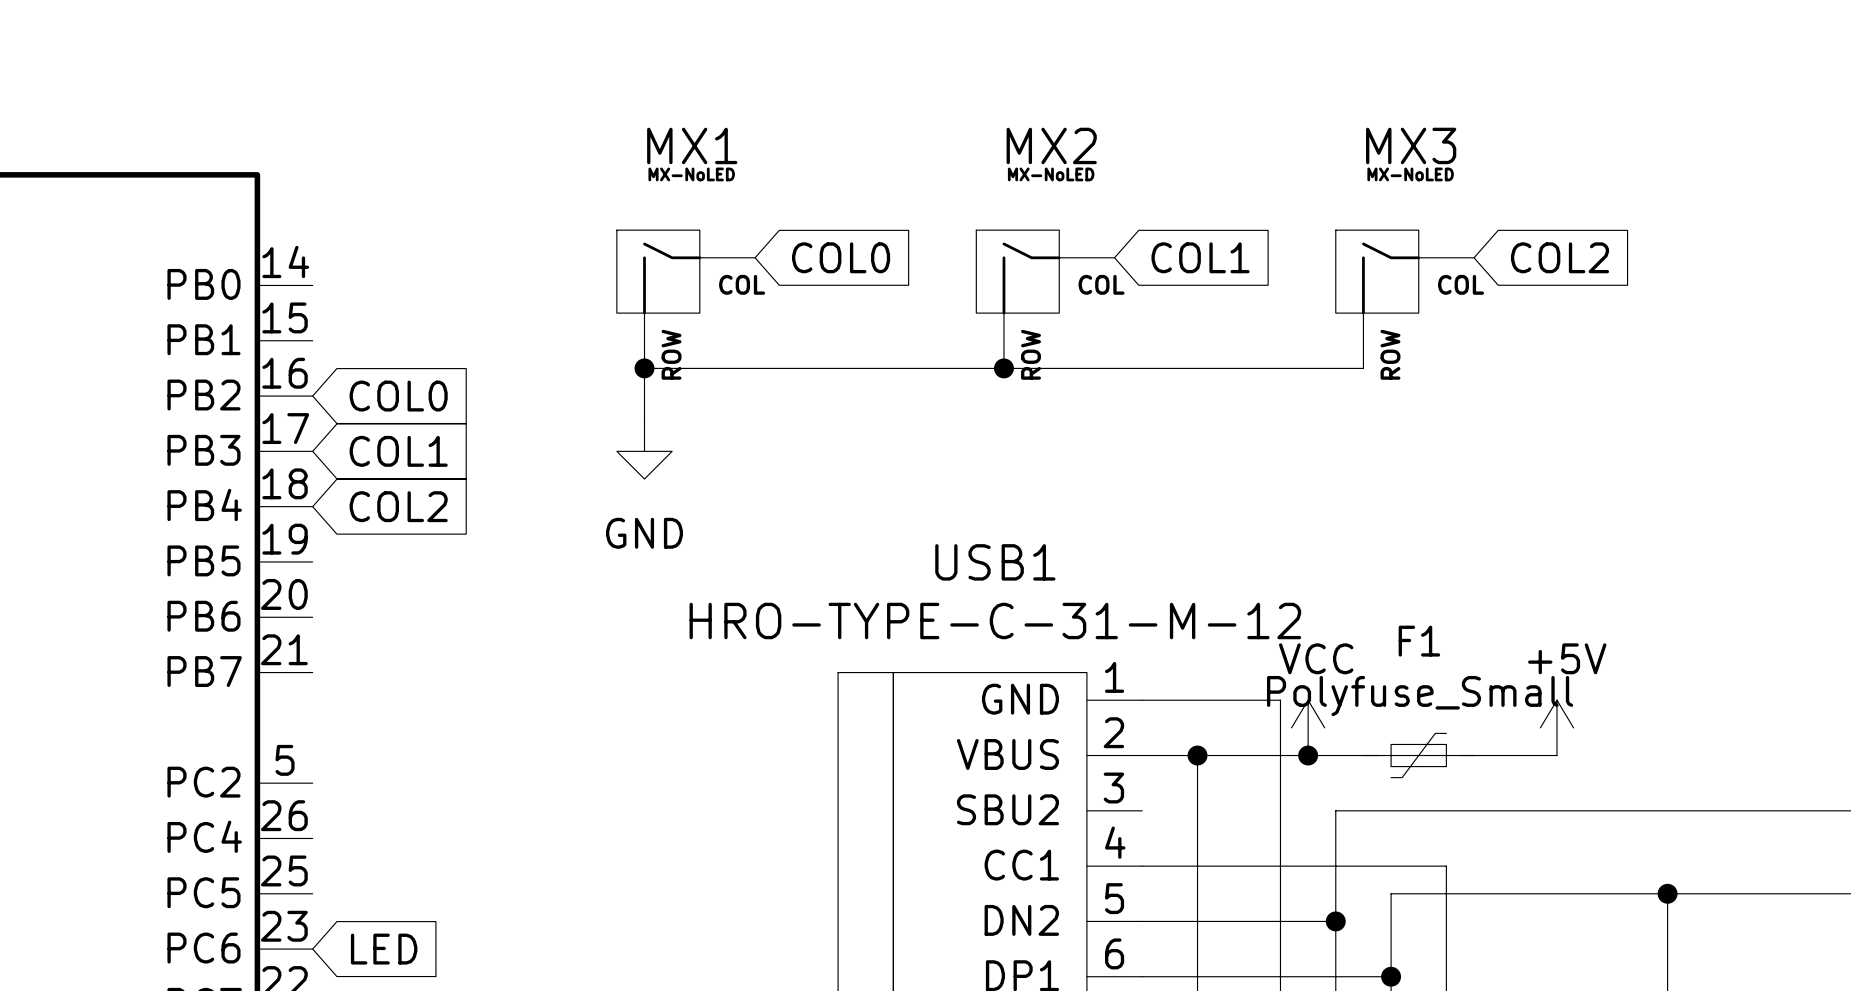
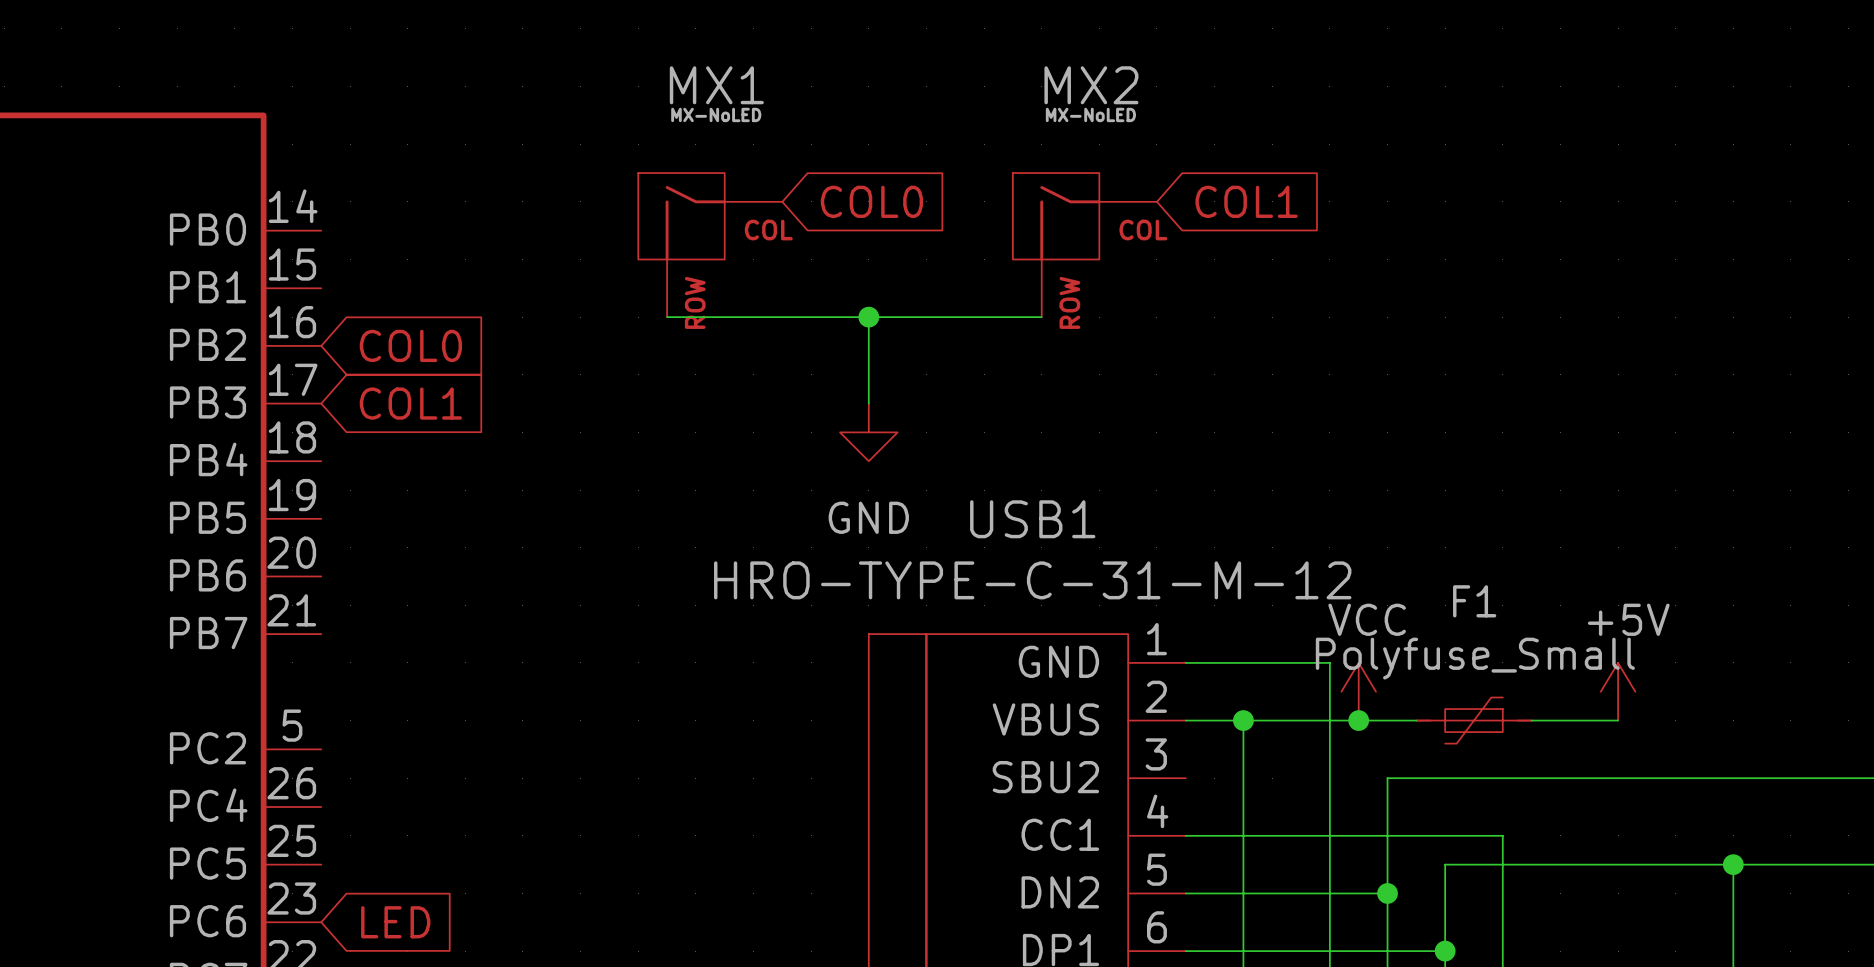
global label: COL2 (1559, 257) -> none
MX3: MX-NoLED (1404, 299) -> none
wire: (644, 368) (644, 423) -> none
junction: (644, 368) -> none
wire: none -> (868, 317) (868, 403)
junction: none -> (868, 317)
wire: (1003, 368) (1363, 368) -> none
junction: (1003, 368) -> none
power symbol position: GND (644, 451) -> GND (868, 432)
global label: COL2 (398, 506) -> none

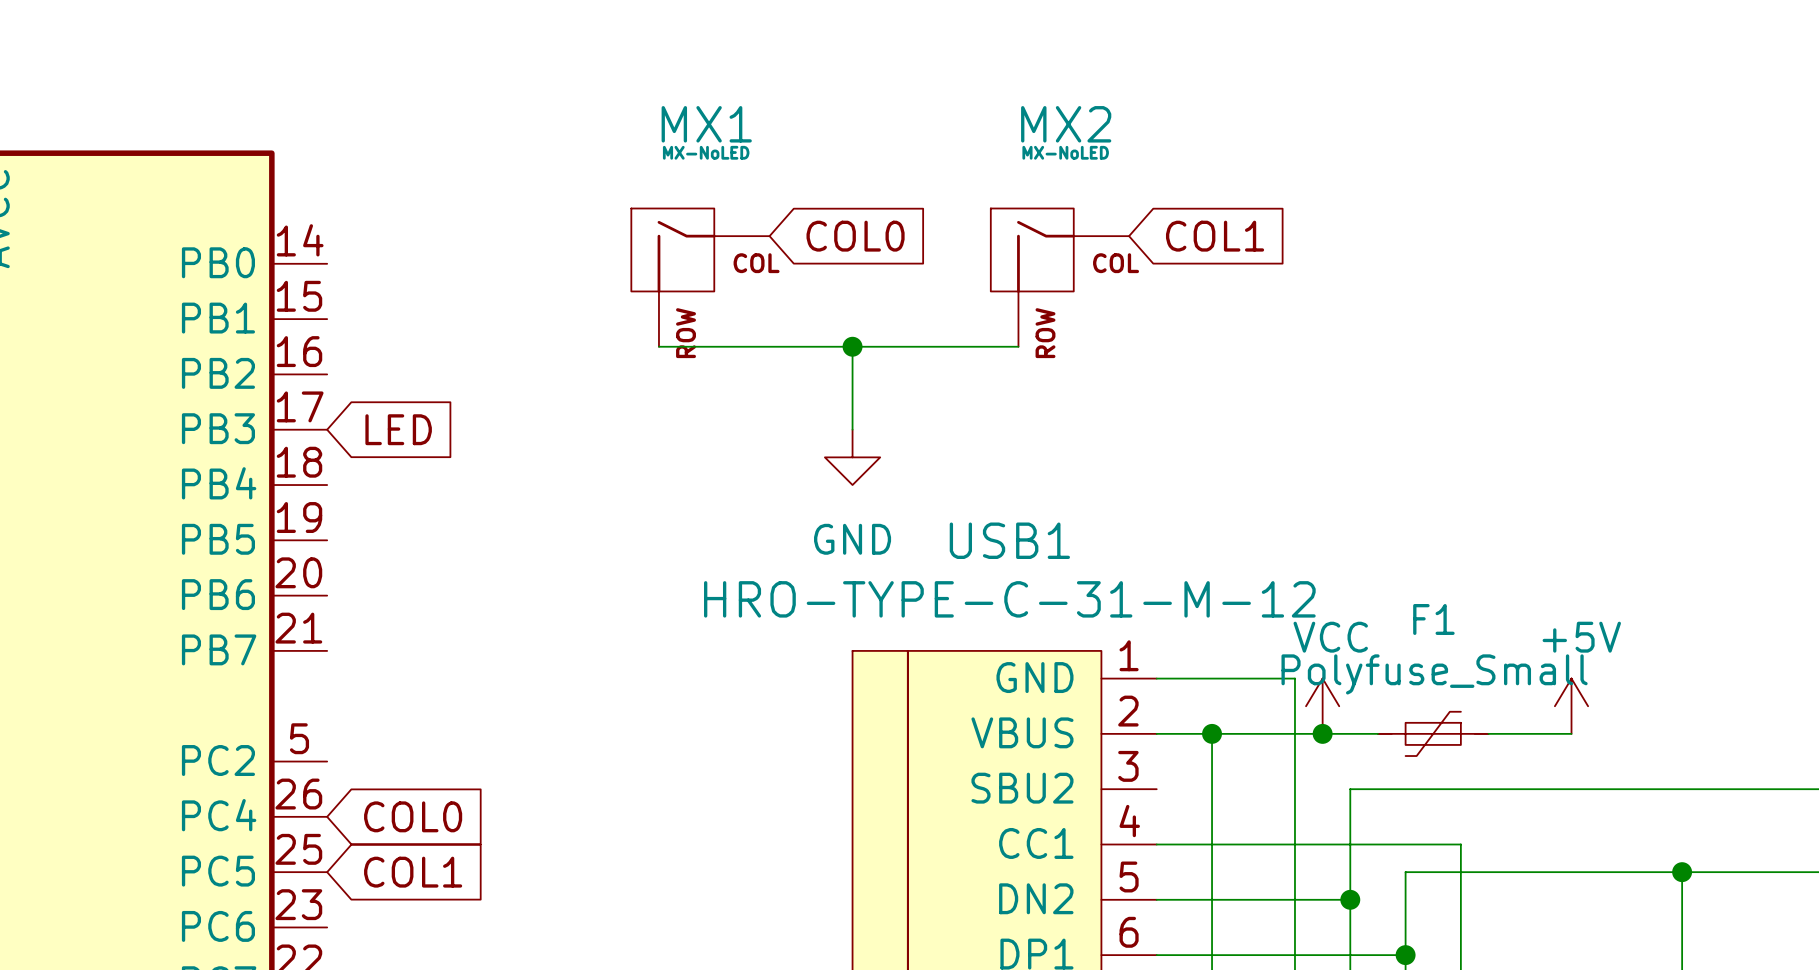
global label position: COL0 (410, 345) -> COL0 (413, 816)
global label: COL1 (410, 403) -> LED (398, 429)
global label: none -> COL1 (413, 872)
global label: LED (395, 922) -> none

